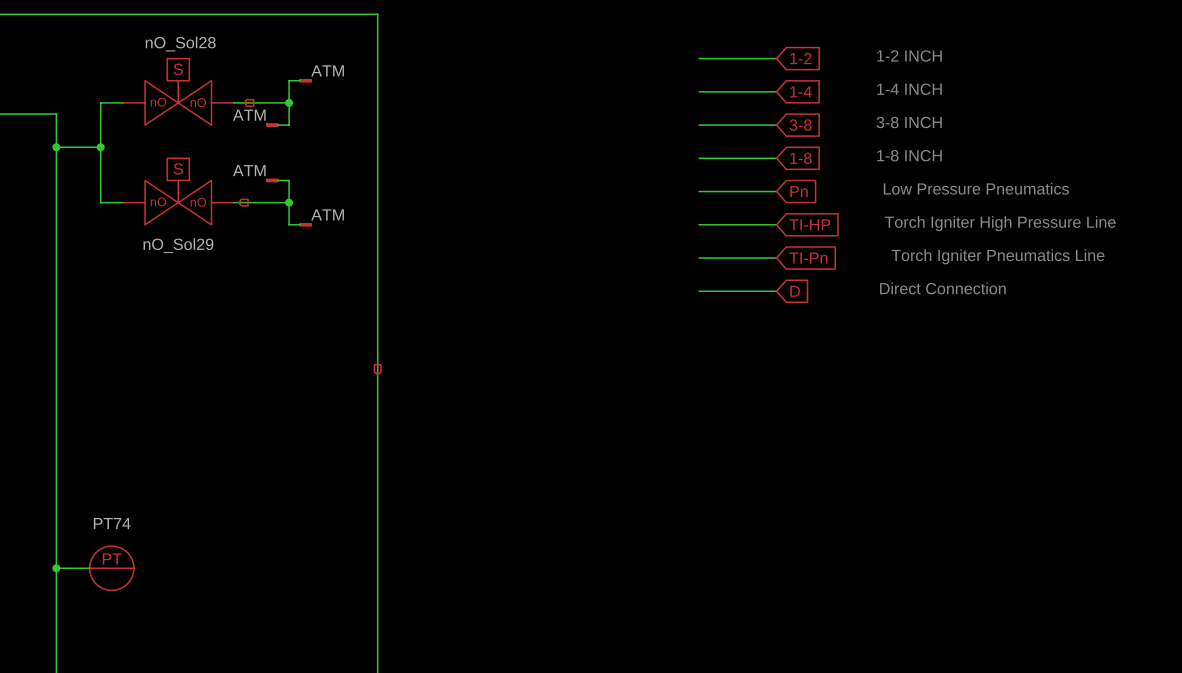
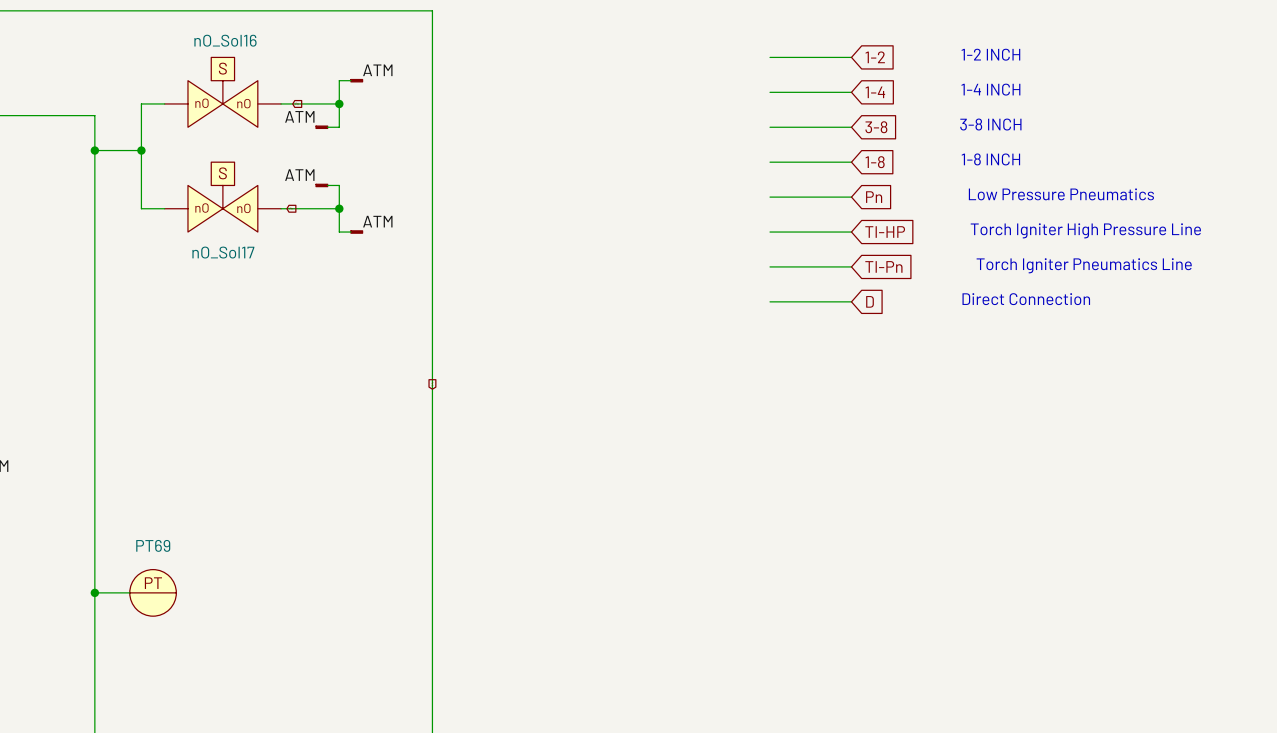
nO_Sol28 name: nO_Sol28 (180, 43) -> nO_Sol16 (225, 40)
nO_Sol29 name: nO_Sol29 (178, 245) -> nO_Sol17 (223, 252)
PT74 name: PT74 (112, 523) -> PT69 (153, 545)

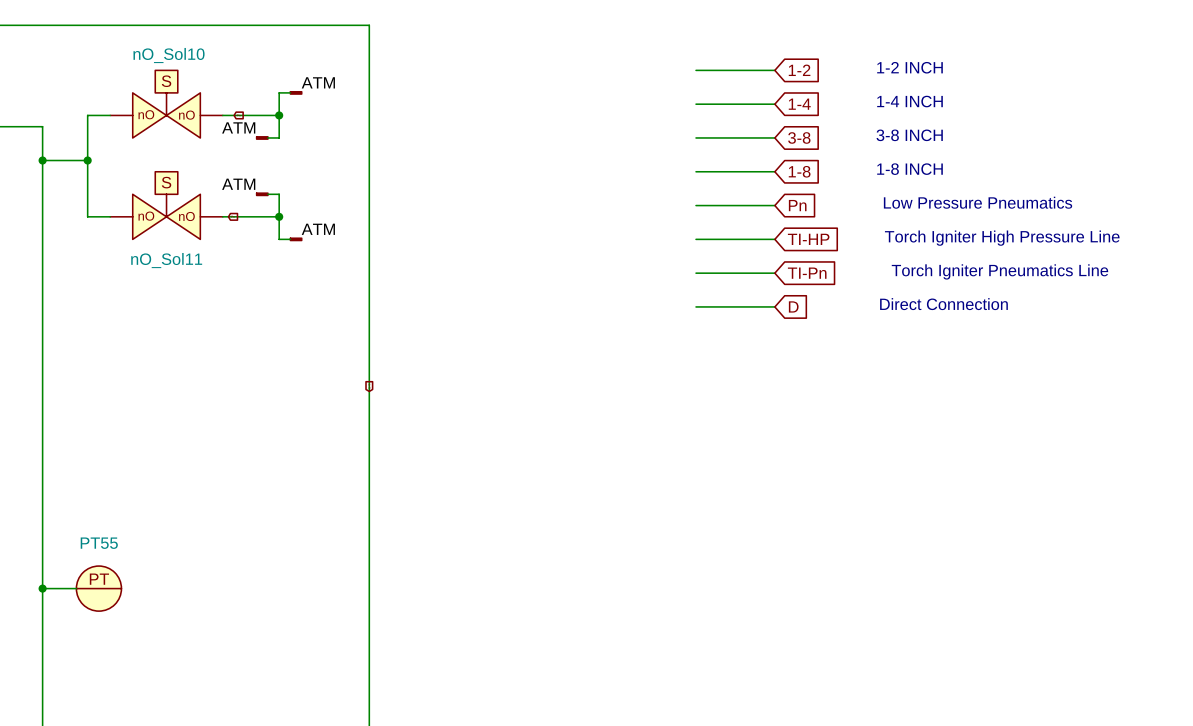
nO_Sol16 name: nO_Sol16 (225, 40) -> nO_Sol10 (169, 55)
nO_Sol17 name: nO_Sol17 (223, 252) -> nO_Sol11 (166, 260)
PT69 name: PT69 (153, 545) -> PT55 (99, 543)

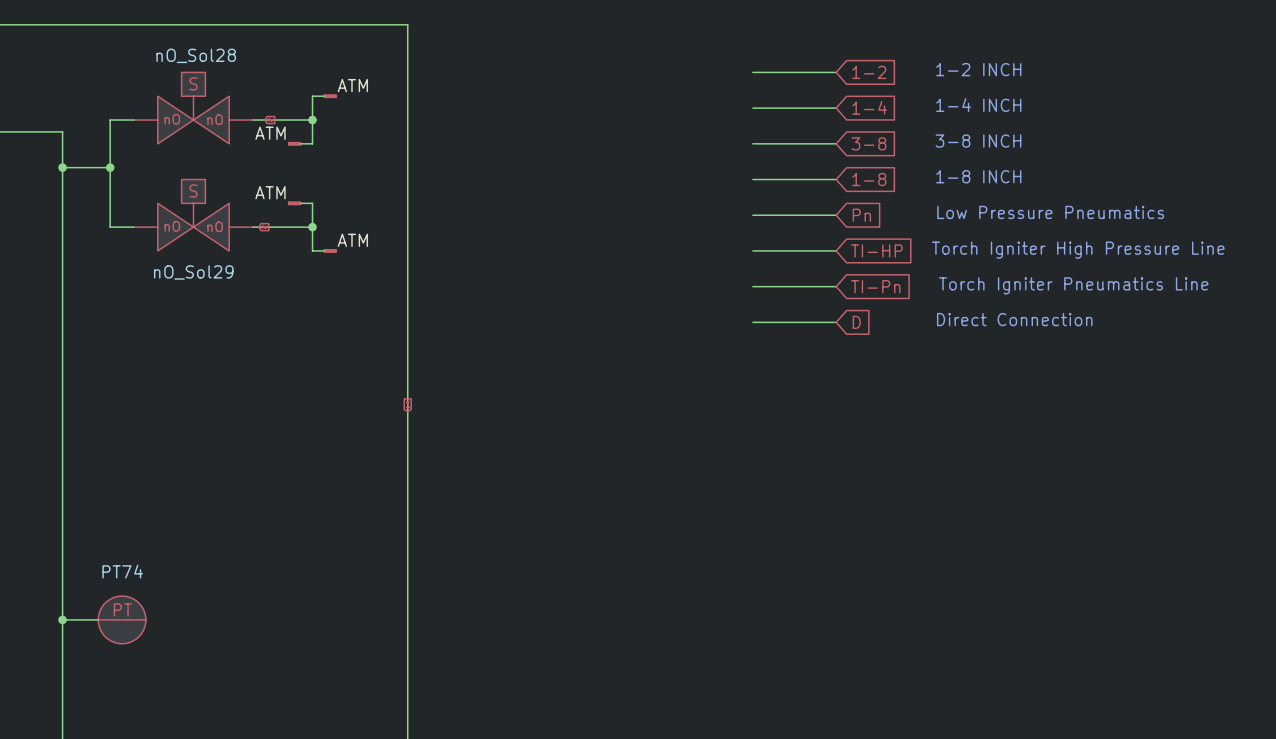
nO_Sol10 name: nO_Sol10 (169, 55) -> nO_Sol28 (196, 55)
nO_Sol11 name: nO_Sol11 (166, 260) -> nO_Sol29 (193, 272)
PT55 name: PT55 (99, 543) -> PT74 (122, 571)

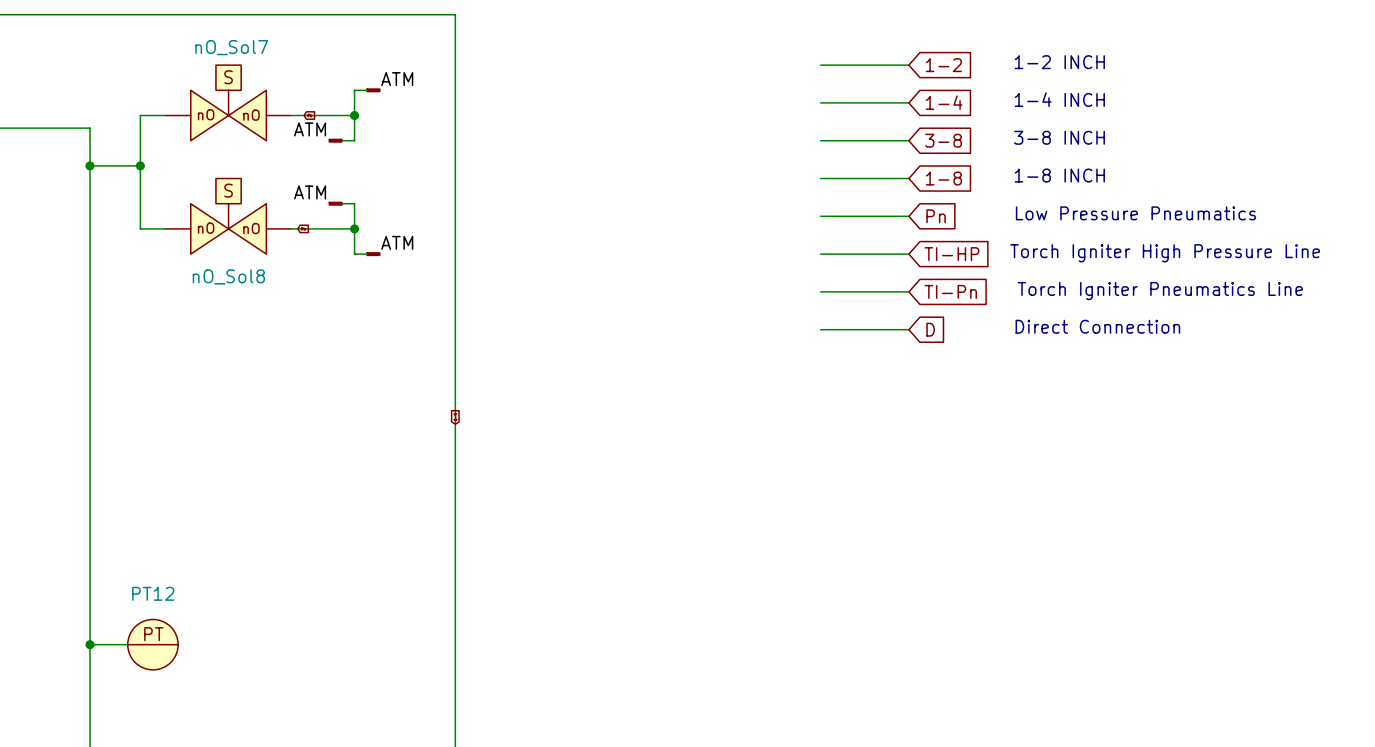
nO_Sol28 name: nO_Sol28 (196, 55) -> nO_Sol7 (231, 47)
nO_Sol29 name: nO_Sol29 (193, 272) -> nO_Sol8 (228, 276)
PT74 name: PT74 (122, 571) -> PT12 (153, 593)

